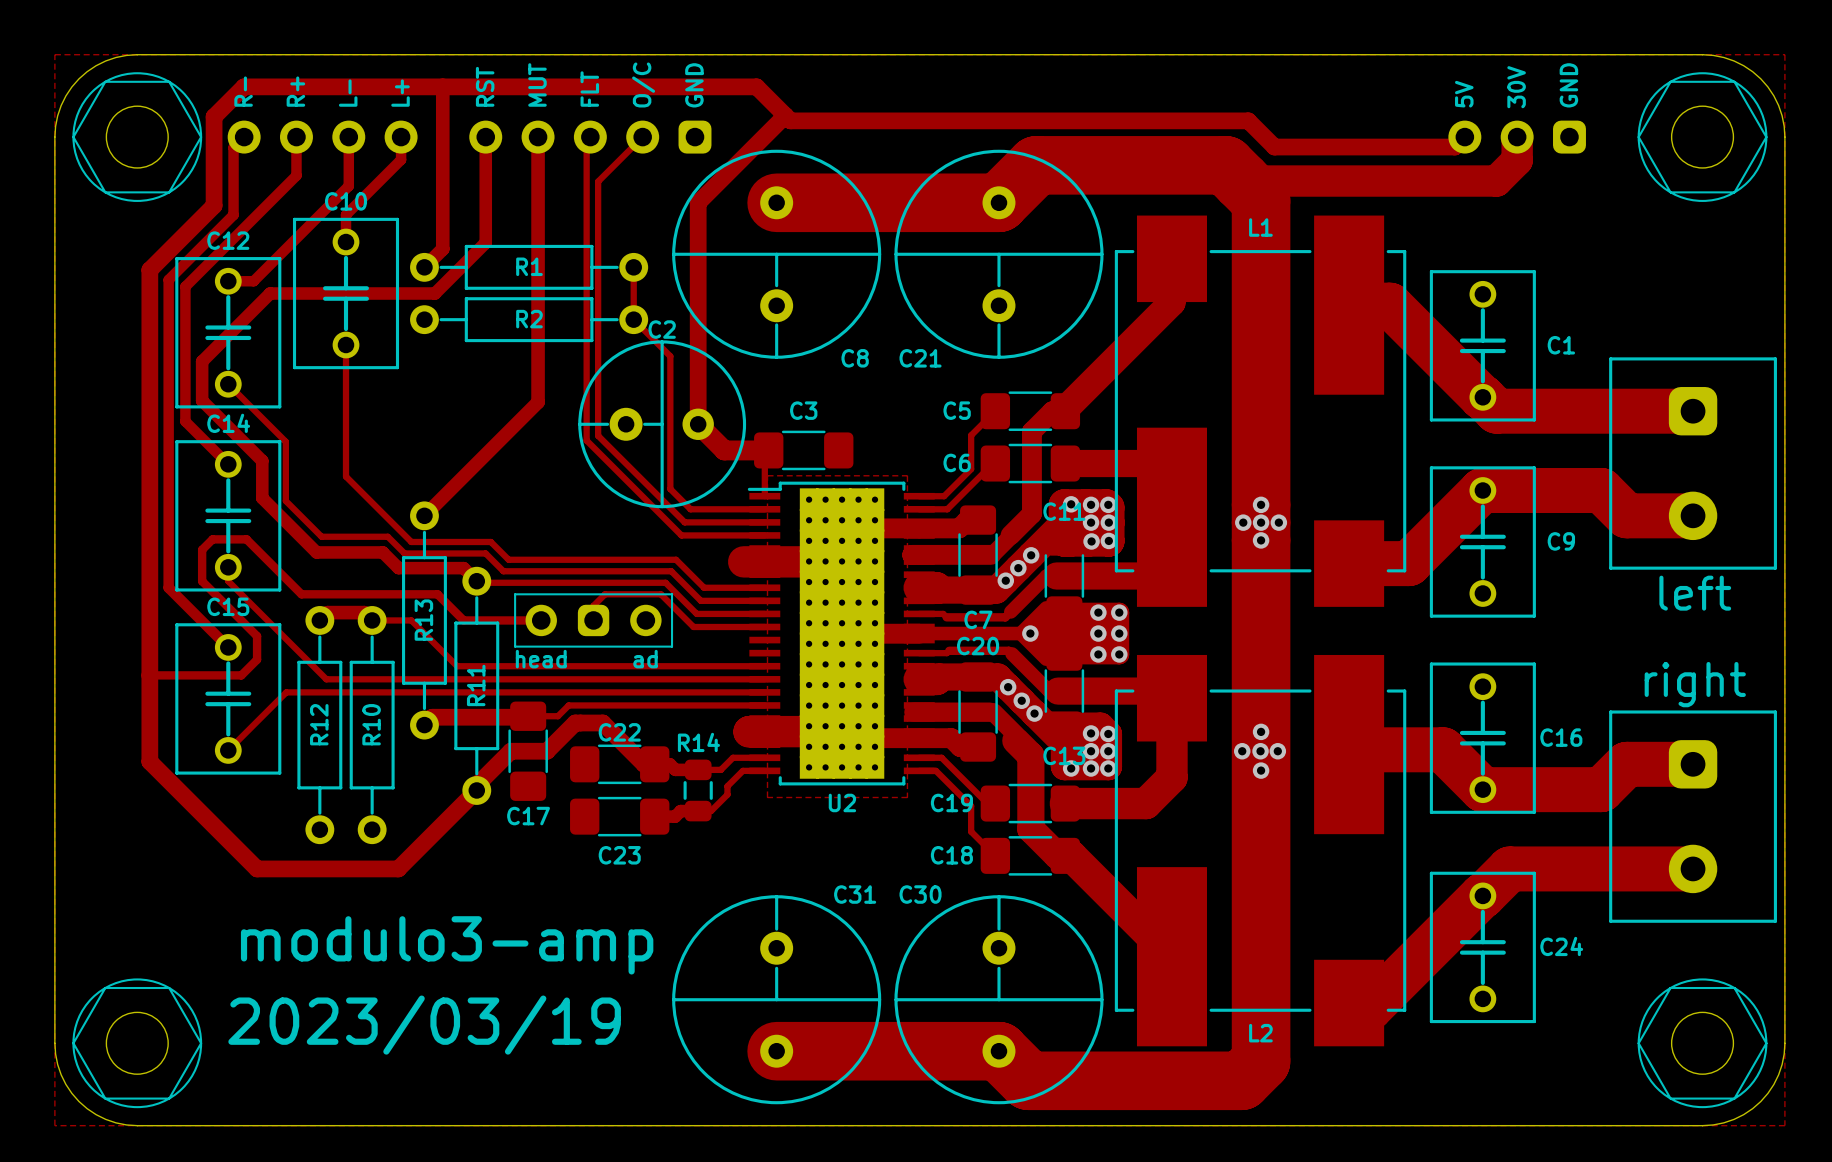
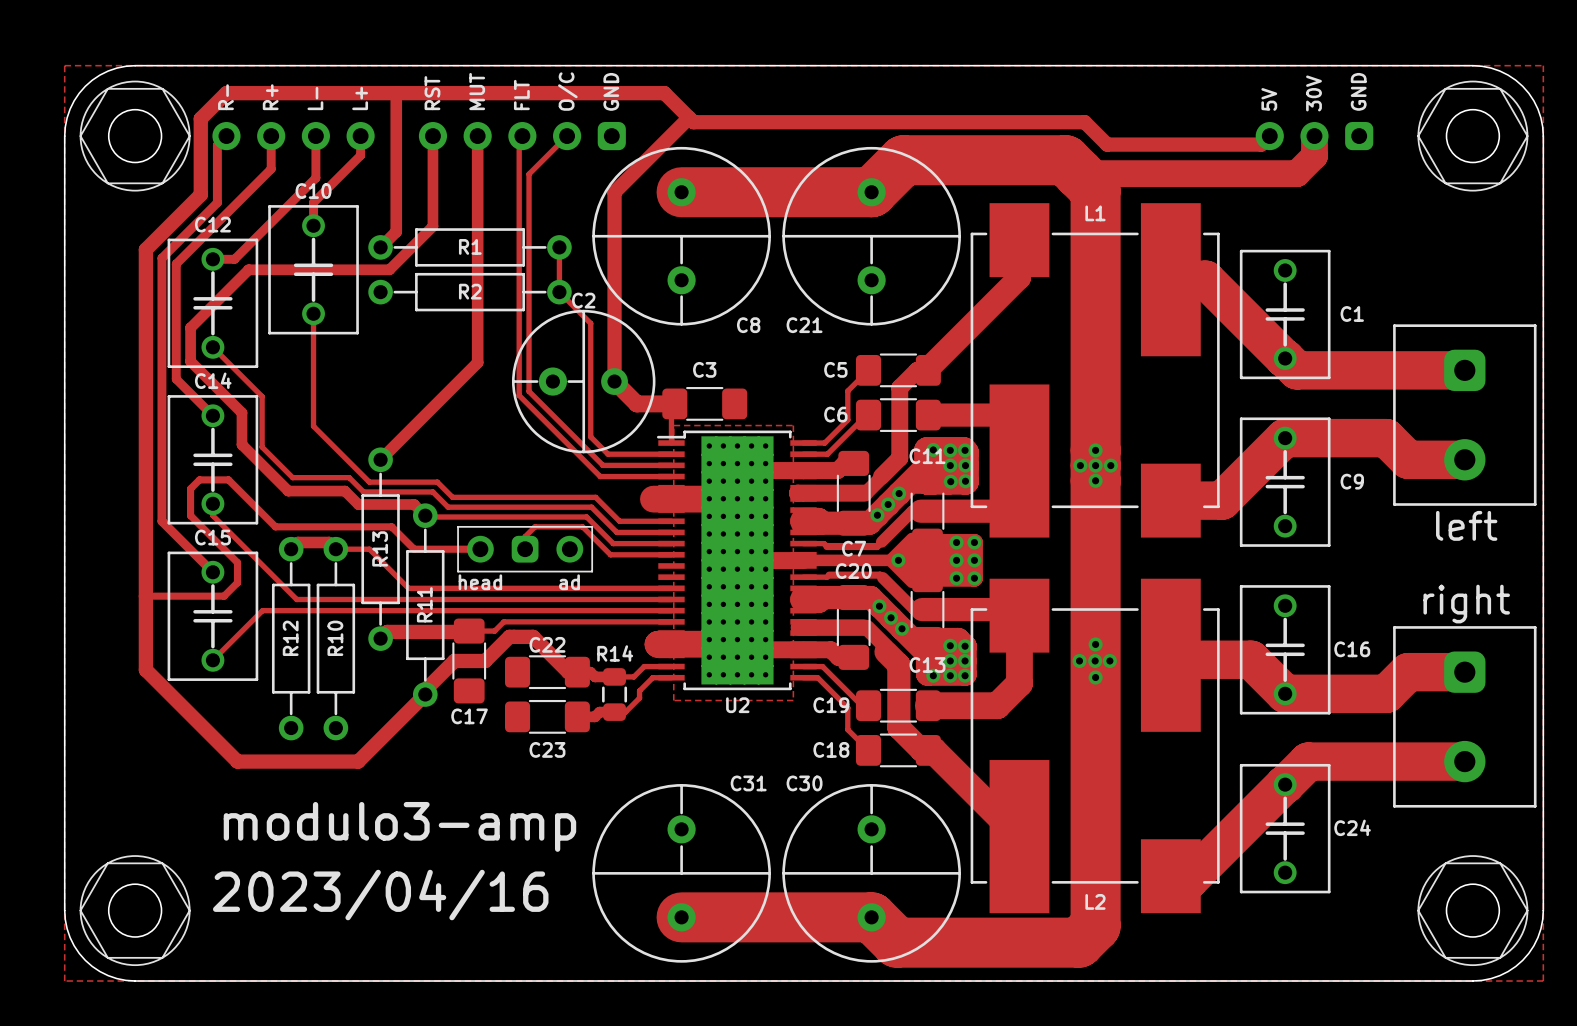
text: 2023/03/19 (424, 1025) -> 2023/04/16 (380, 895)

